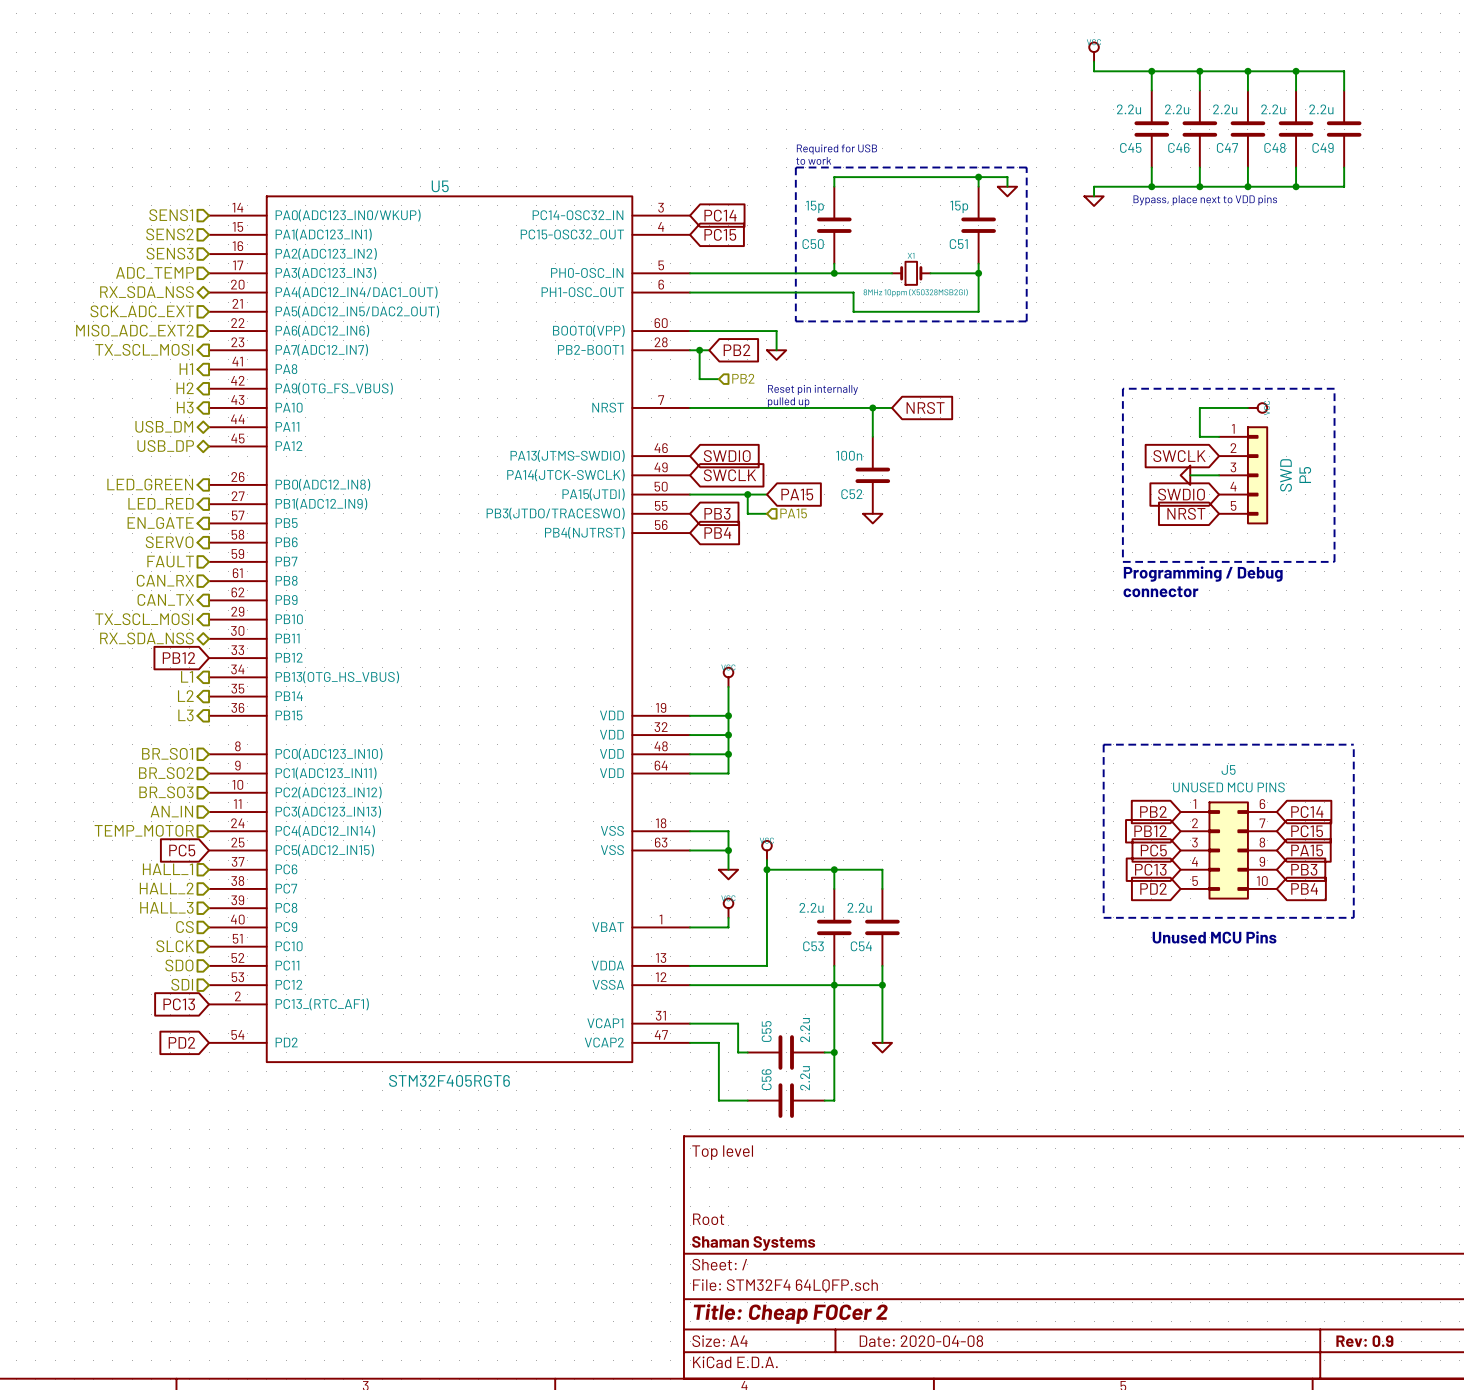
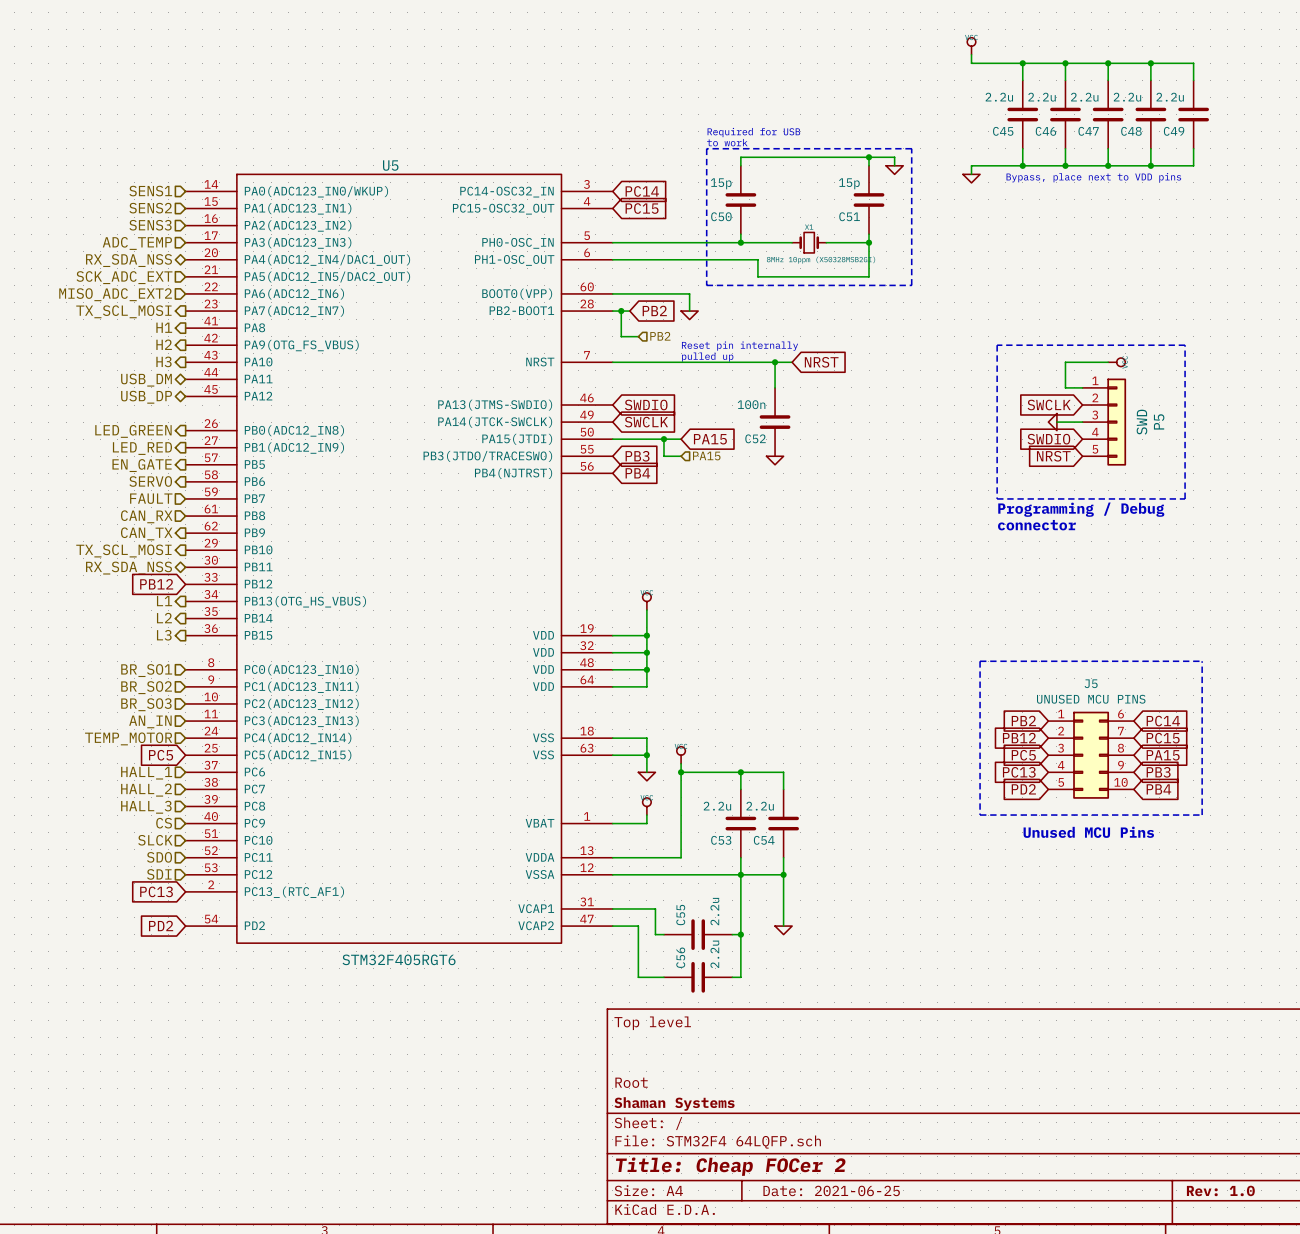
title block: Date: 2020-04-08 (921, 1341) -> Date: 2021-06-25 (831, 1190)
title block: Rev: 0.9 (1364, 1341) -> Rev: 1.0 (1220, 1190)

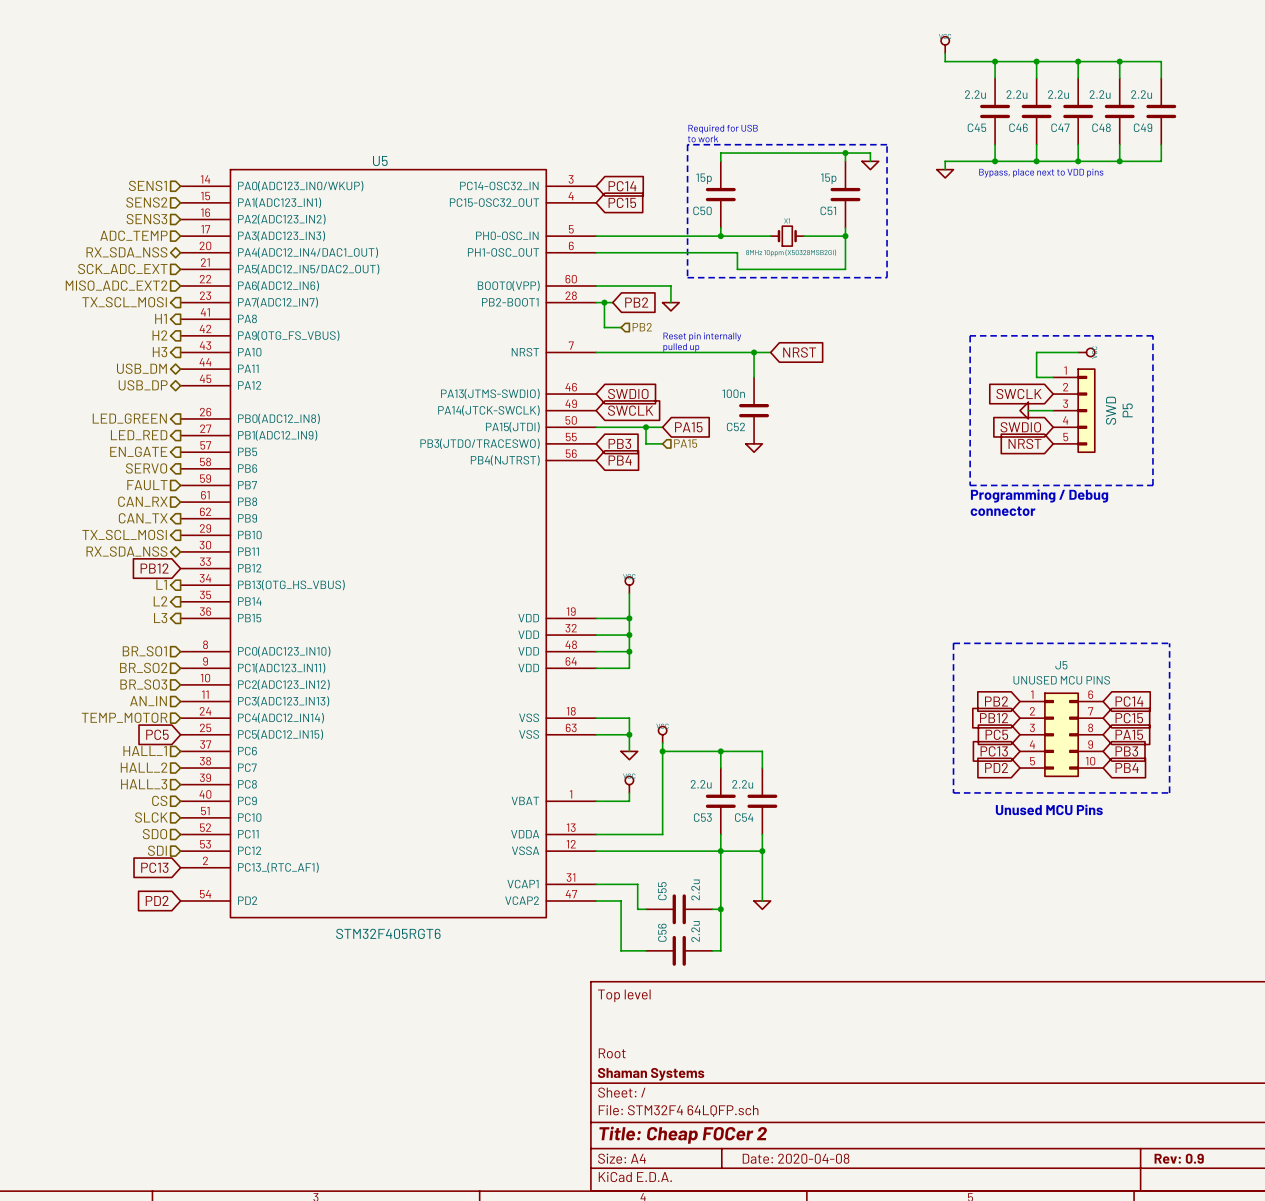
title block: Date: 2021-06-25 (831, 1190) -> Date: 2020-04-08 (796, 1158)
title block: Rev: 1.0 (1220, 1190) -> Rev: 0.9 (1179, 1158)

